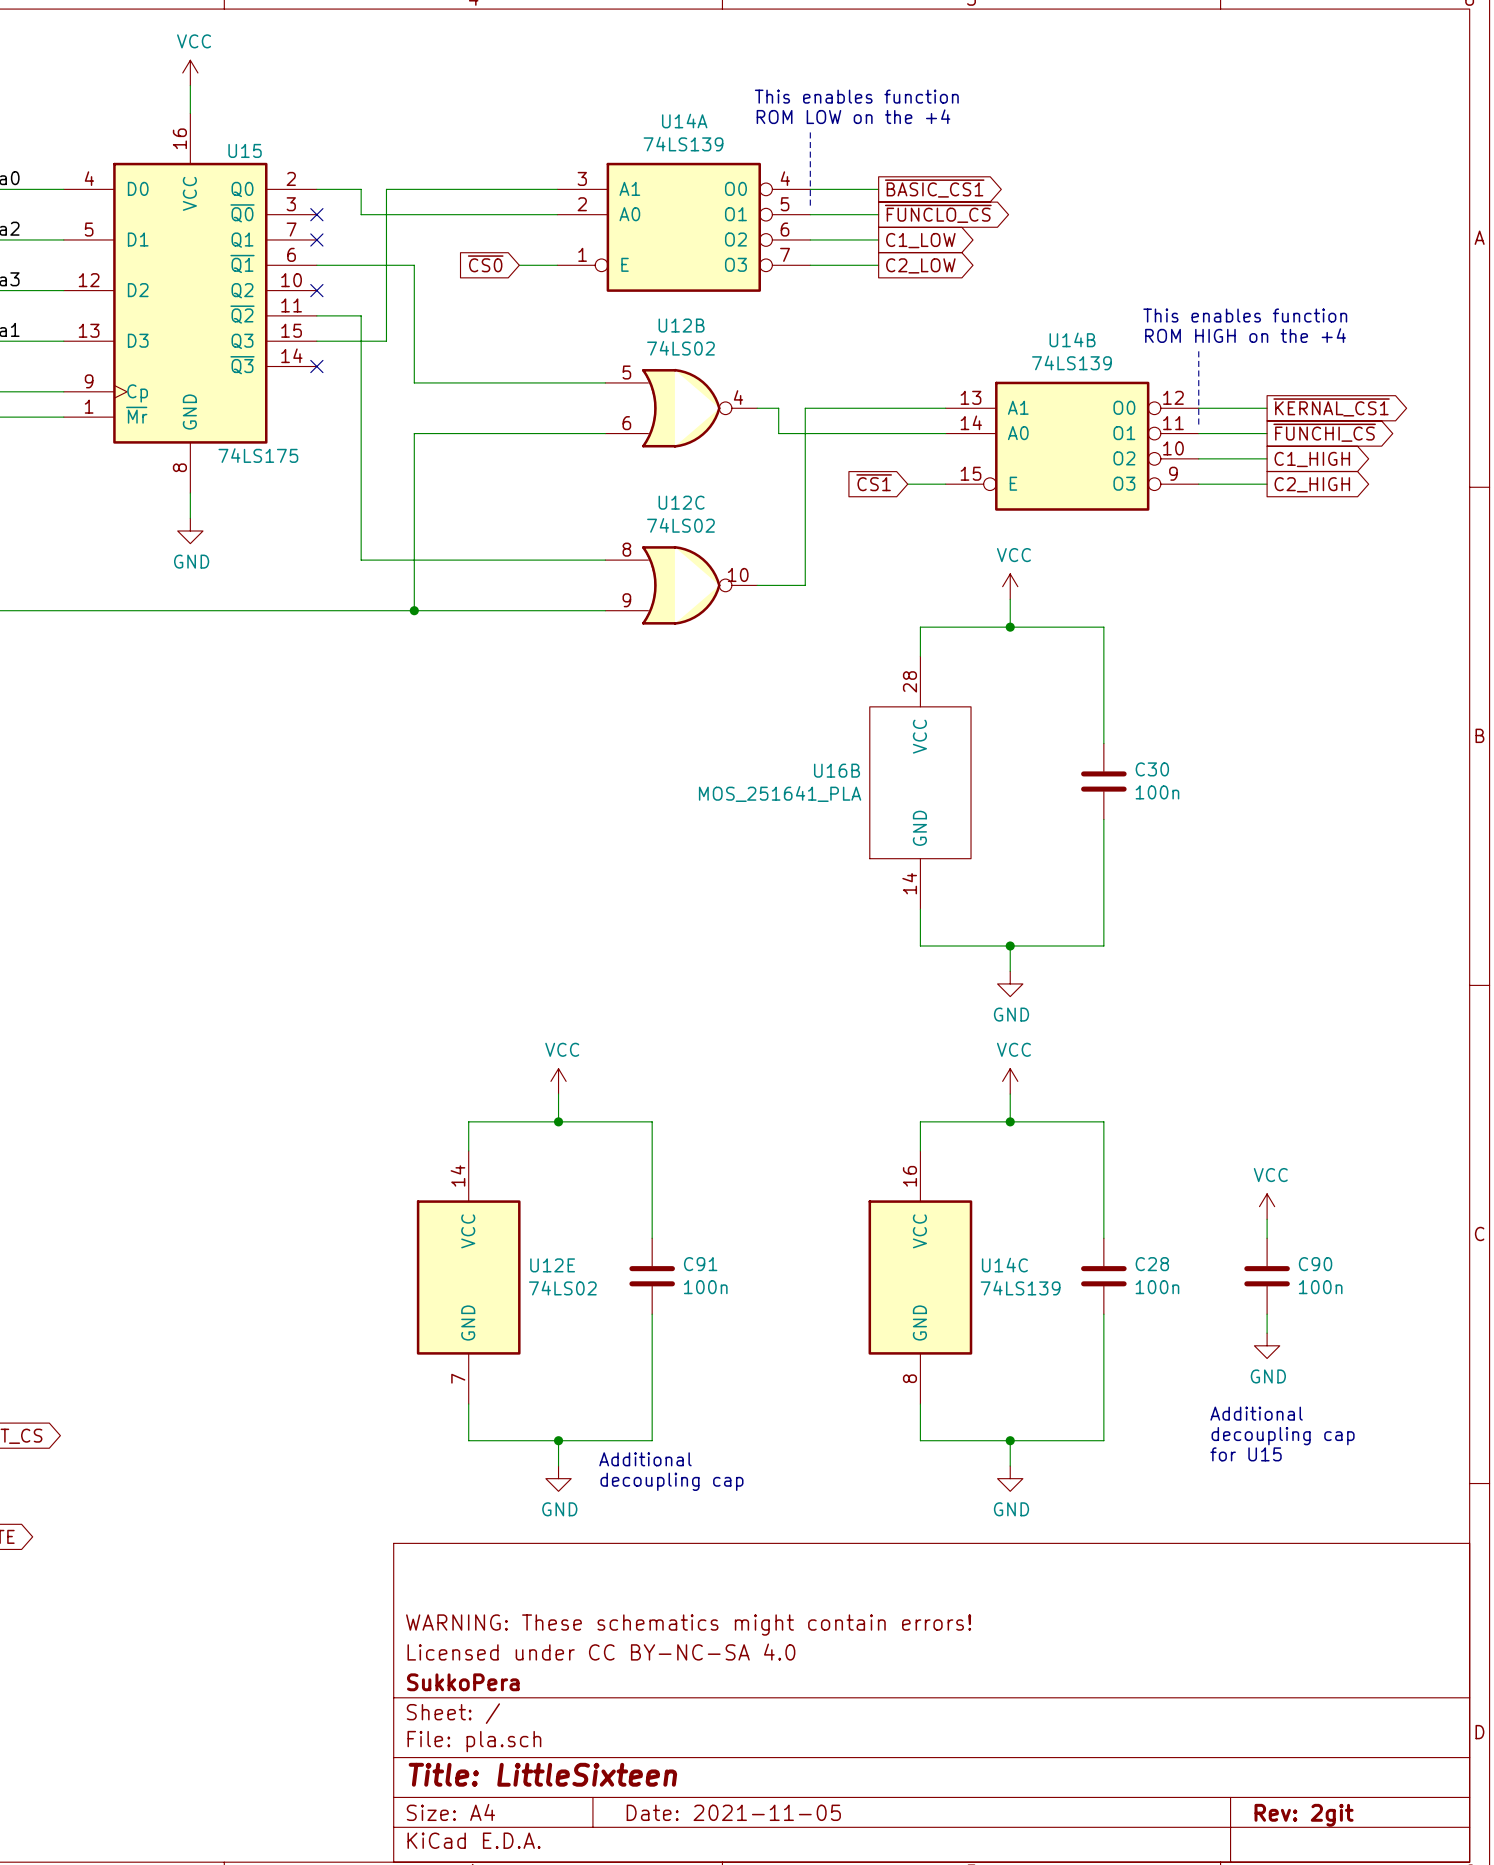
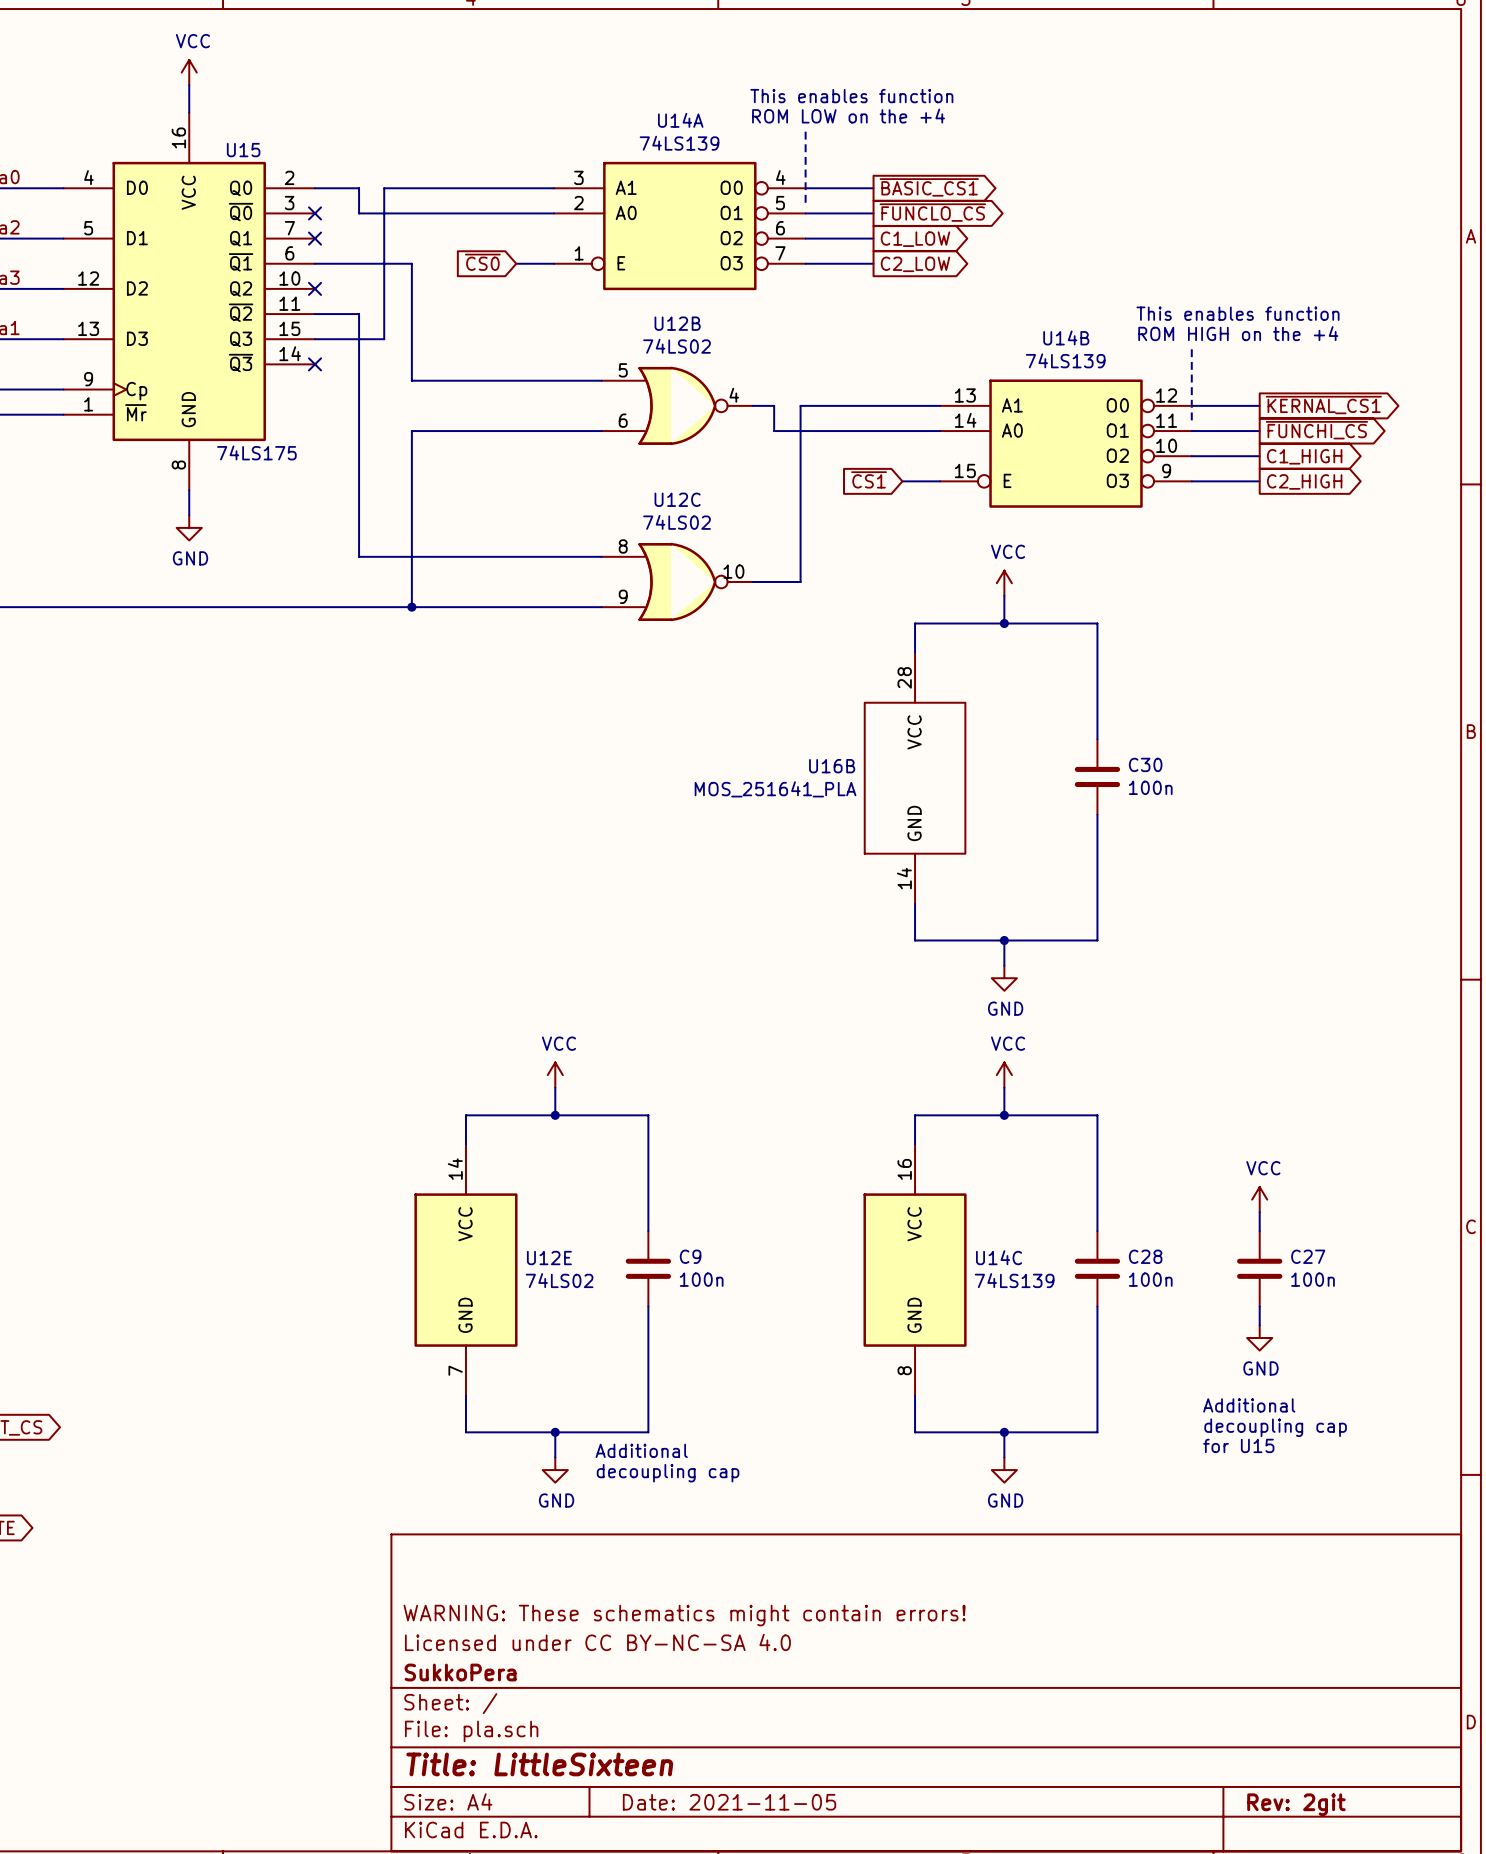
C91 name: C91 (700, 1264) -> C9 (690, 1256)
C90 name: C90 (1315, 1264) -> C27 (1308, 1256)

